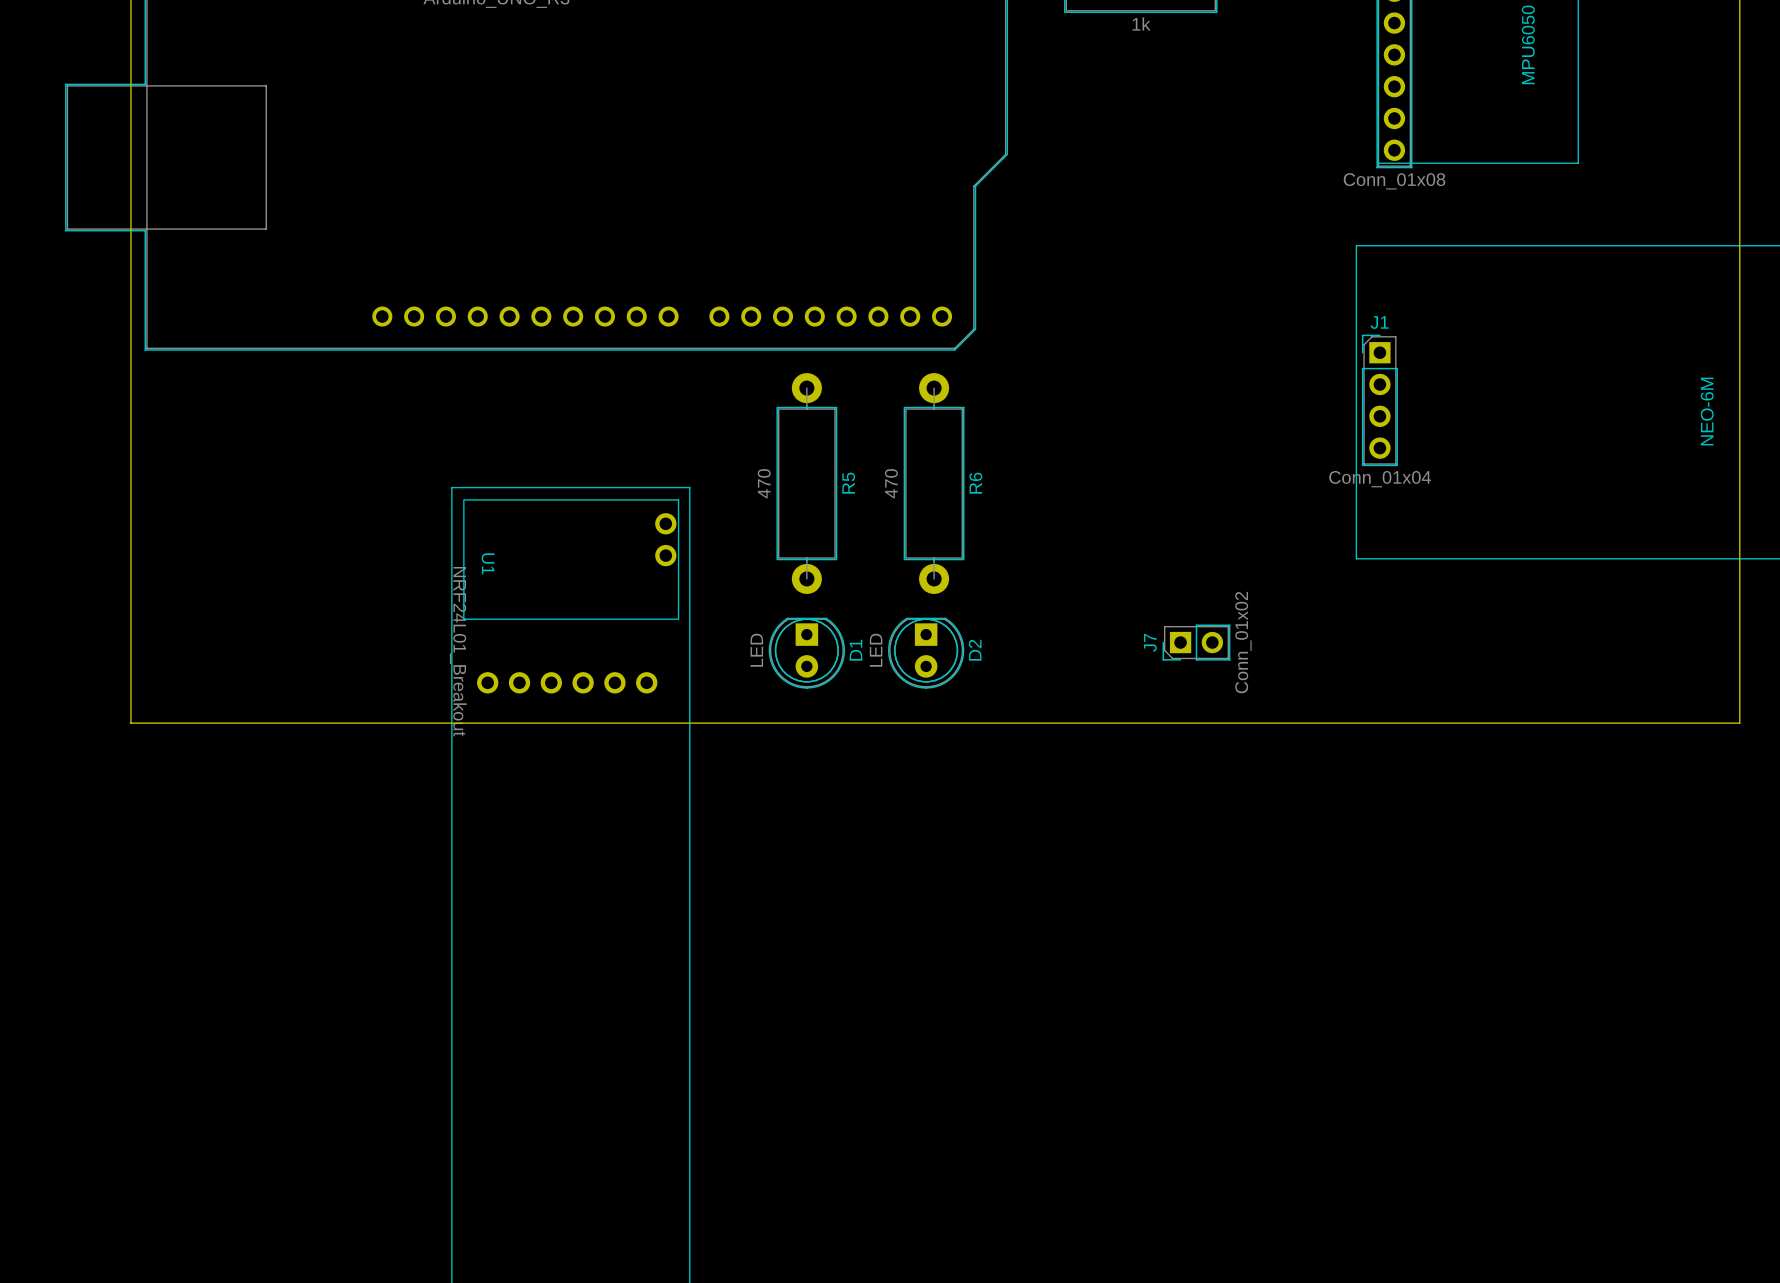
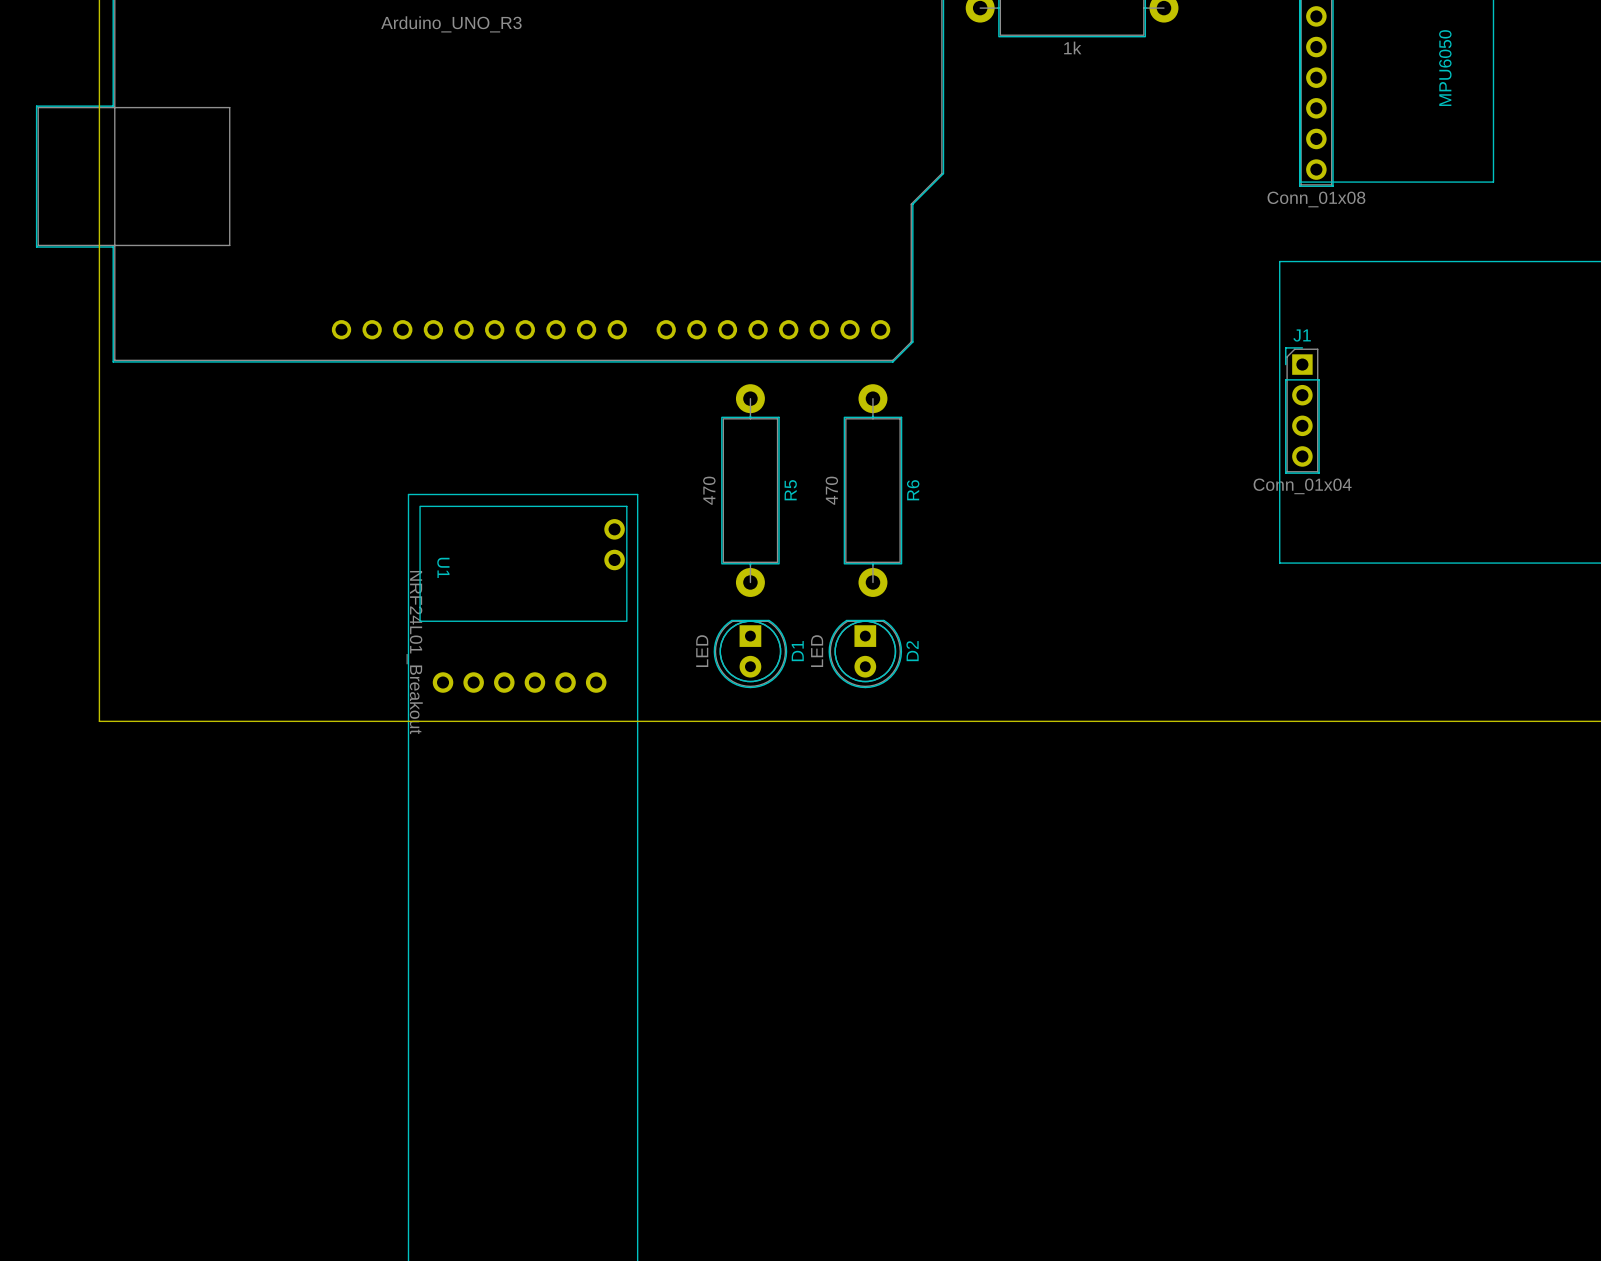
J7: Conn_01x02 (1196, 642) -> none

